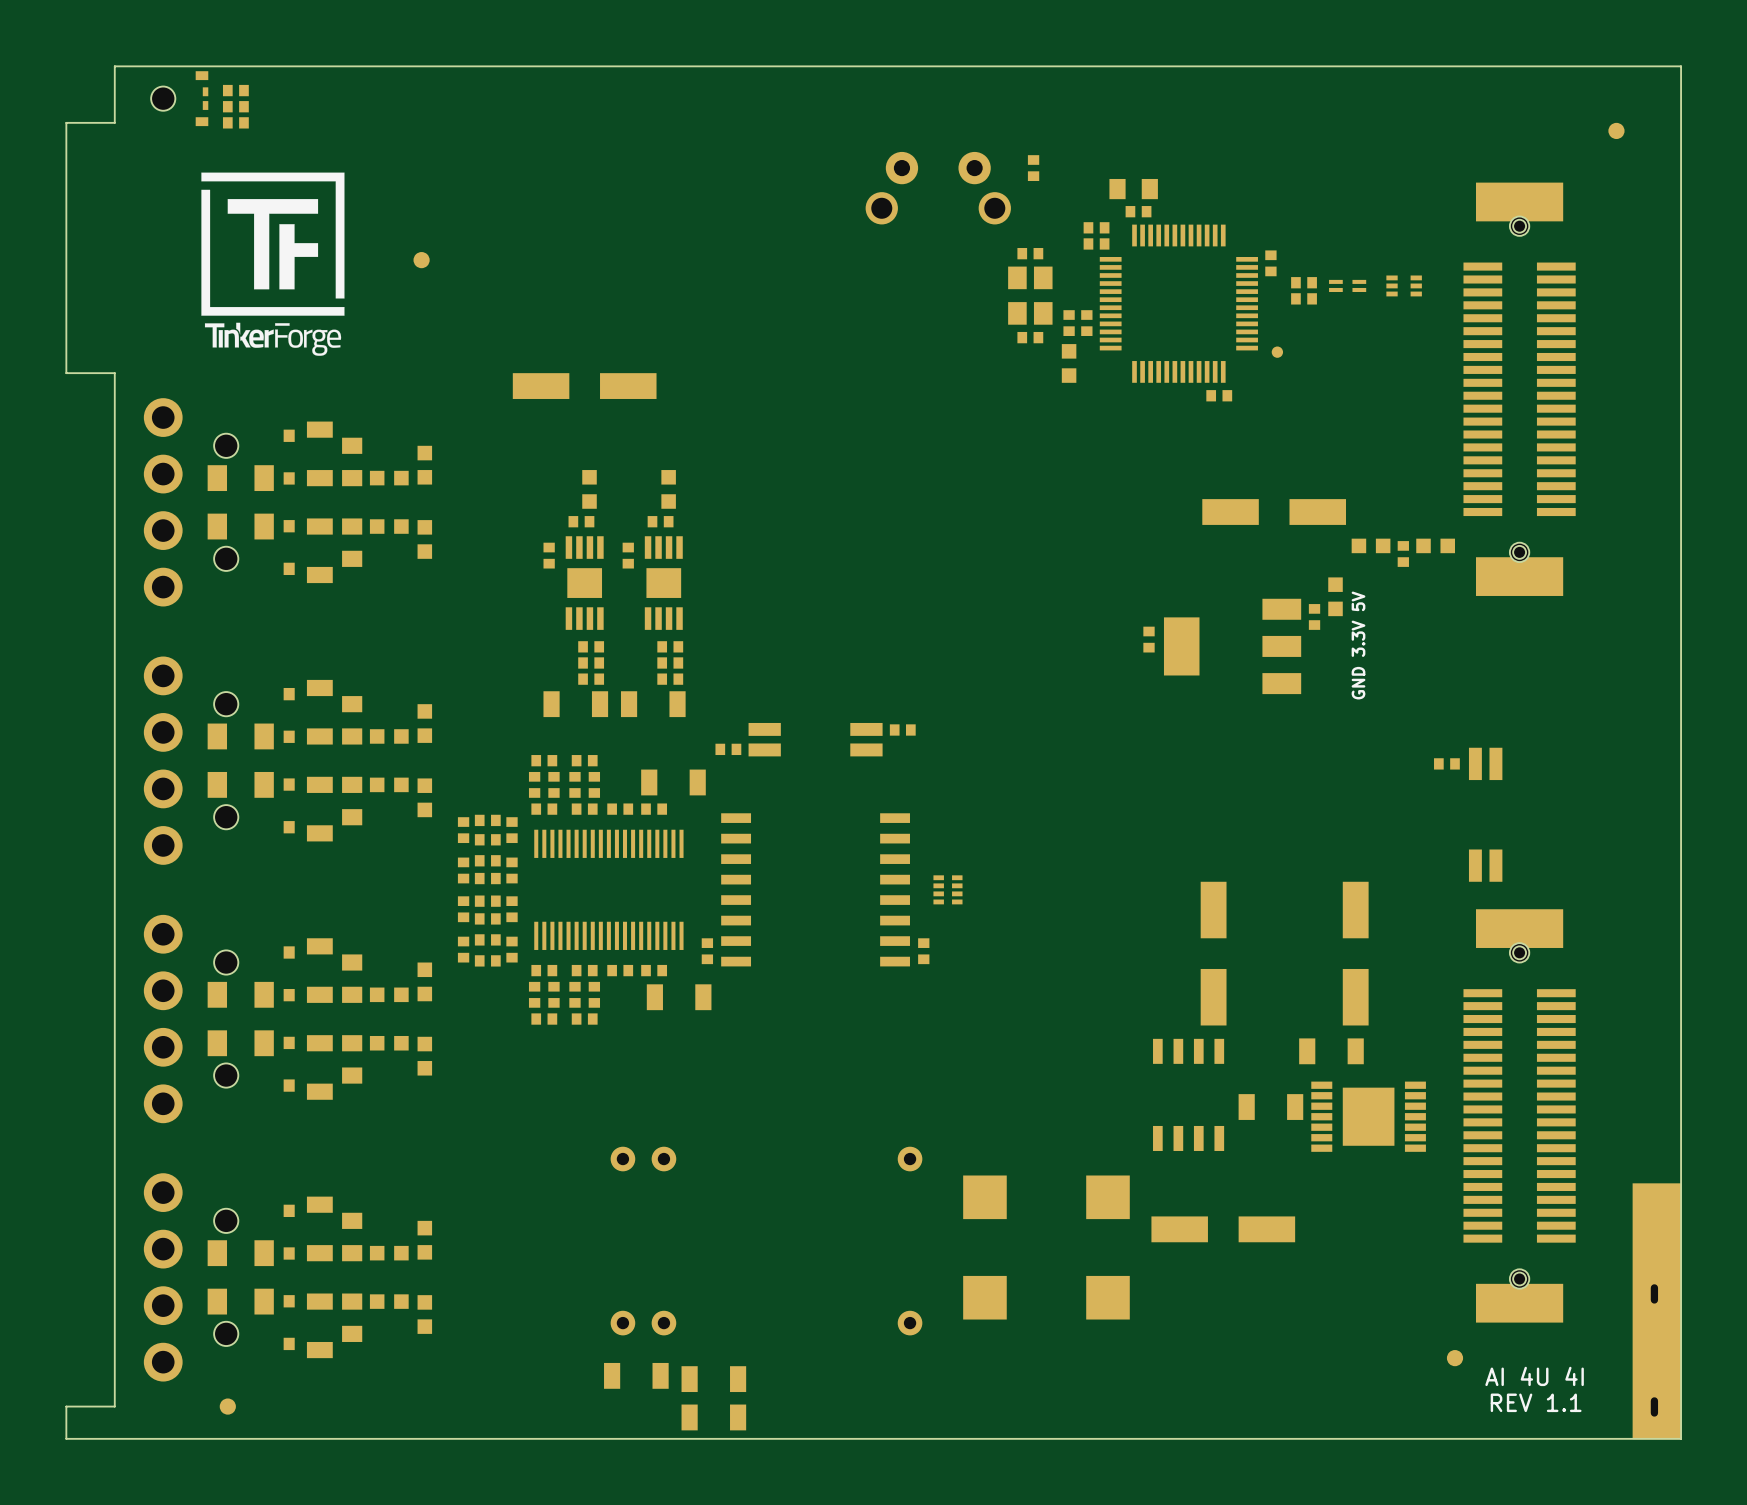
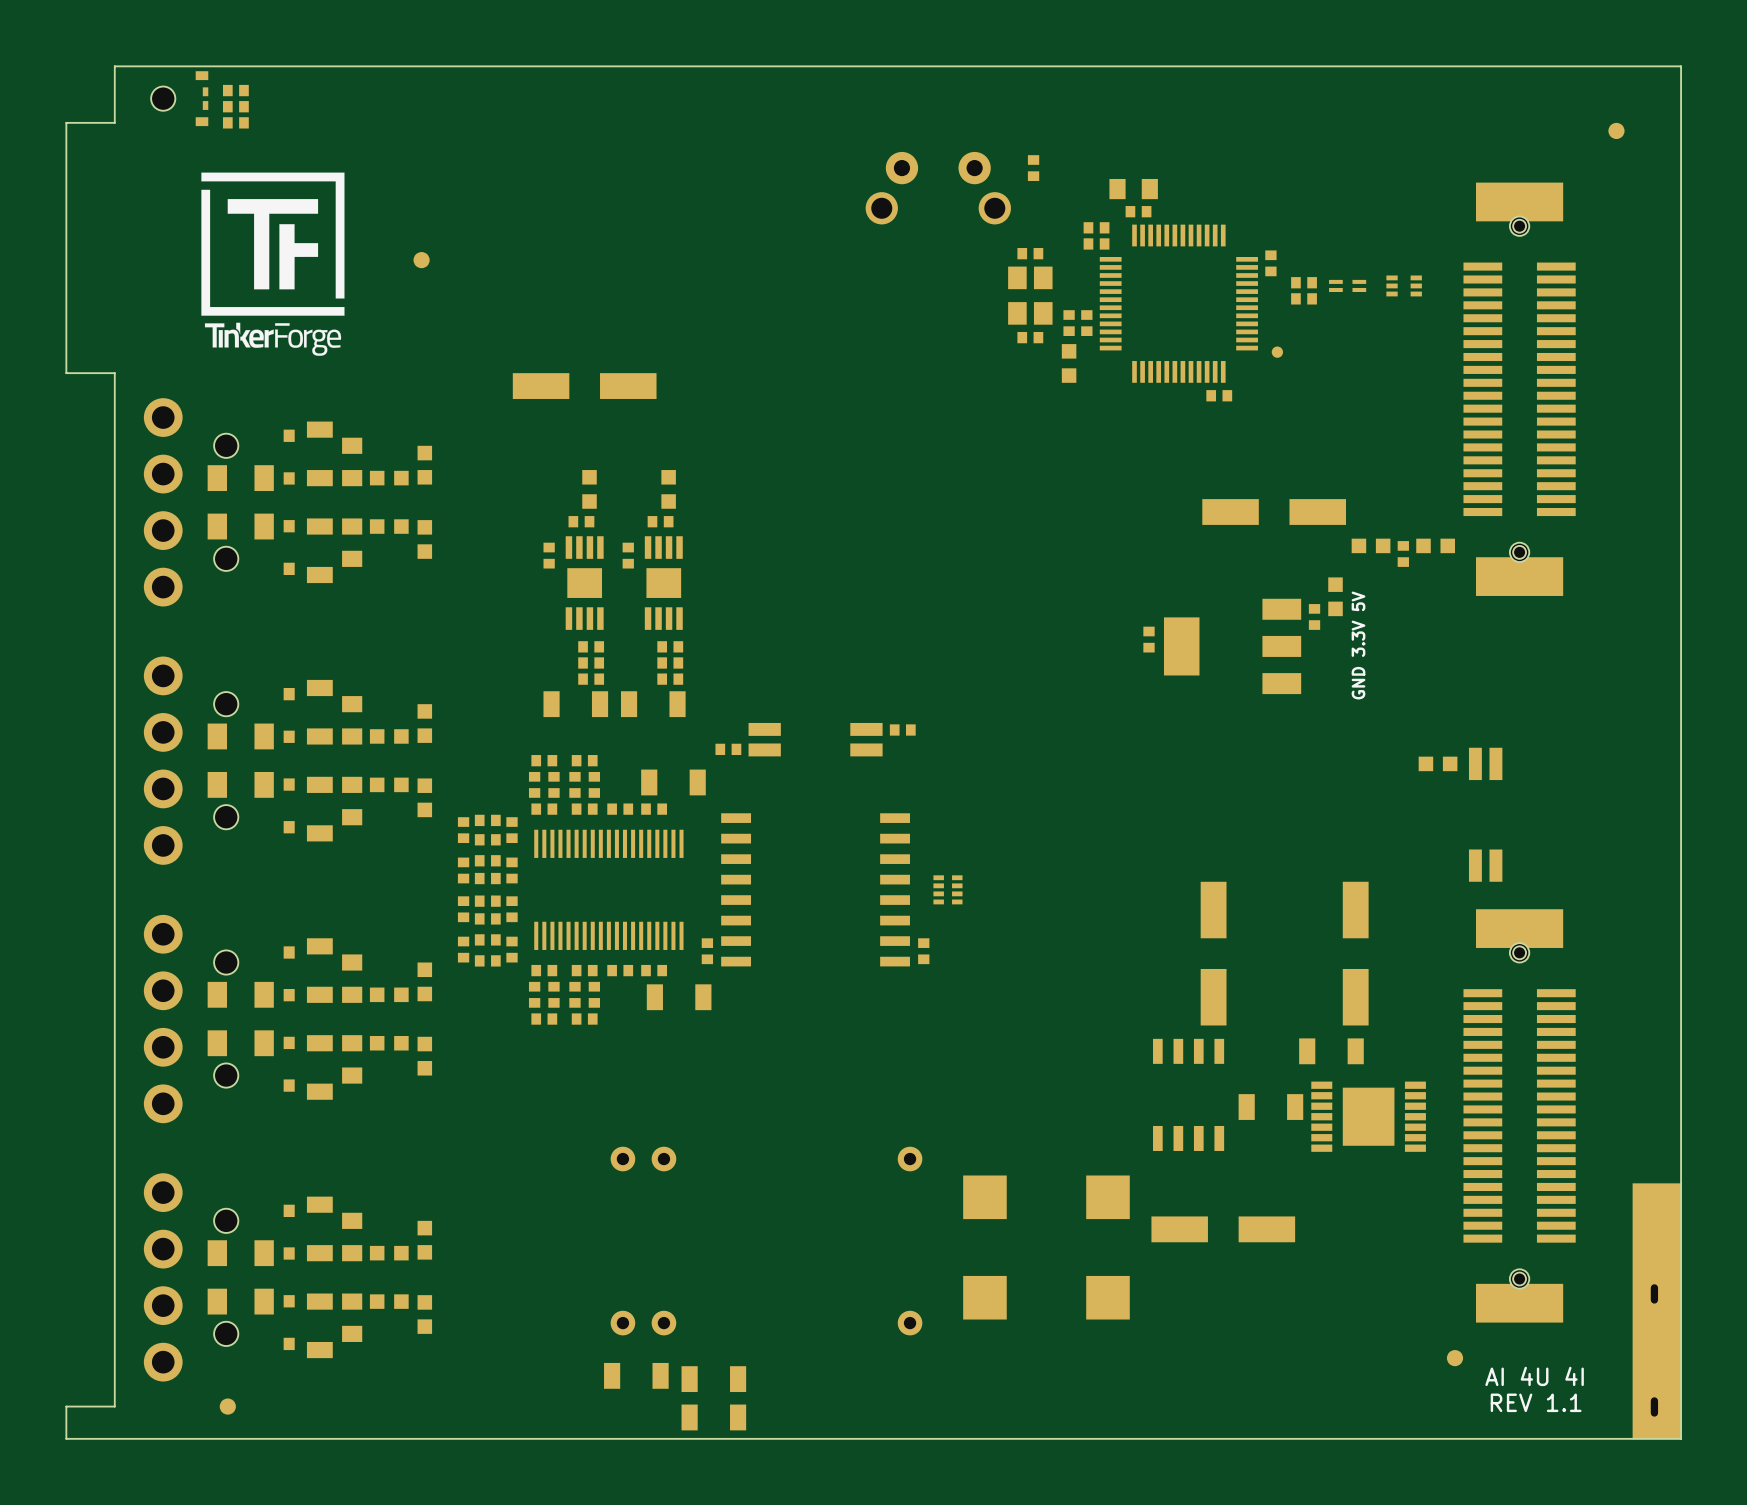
part footprint: [1434, 758, 1460, 770] -> [1418, 756, 1458, 772]

